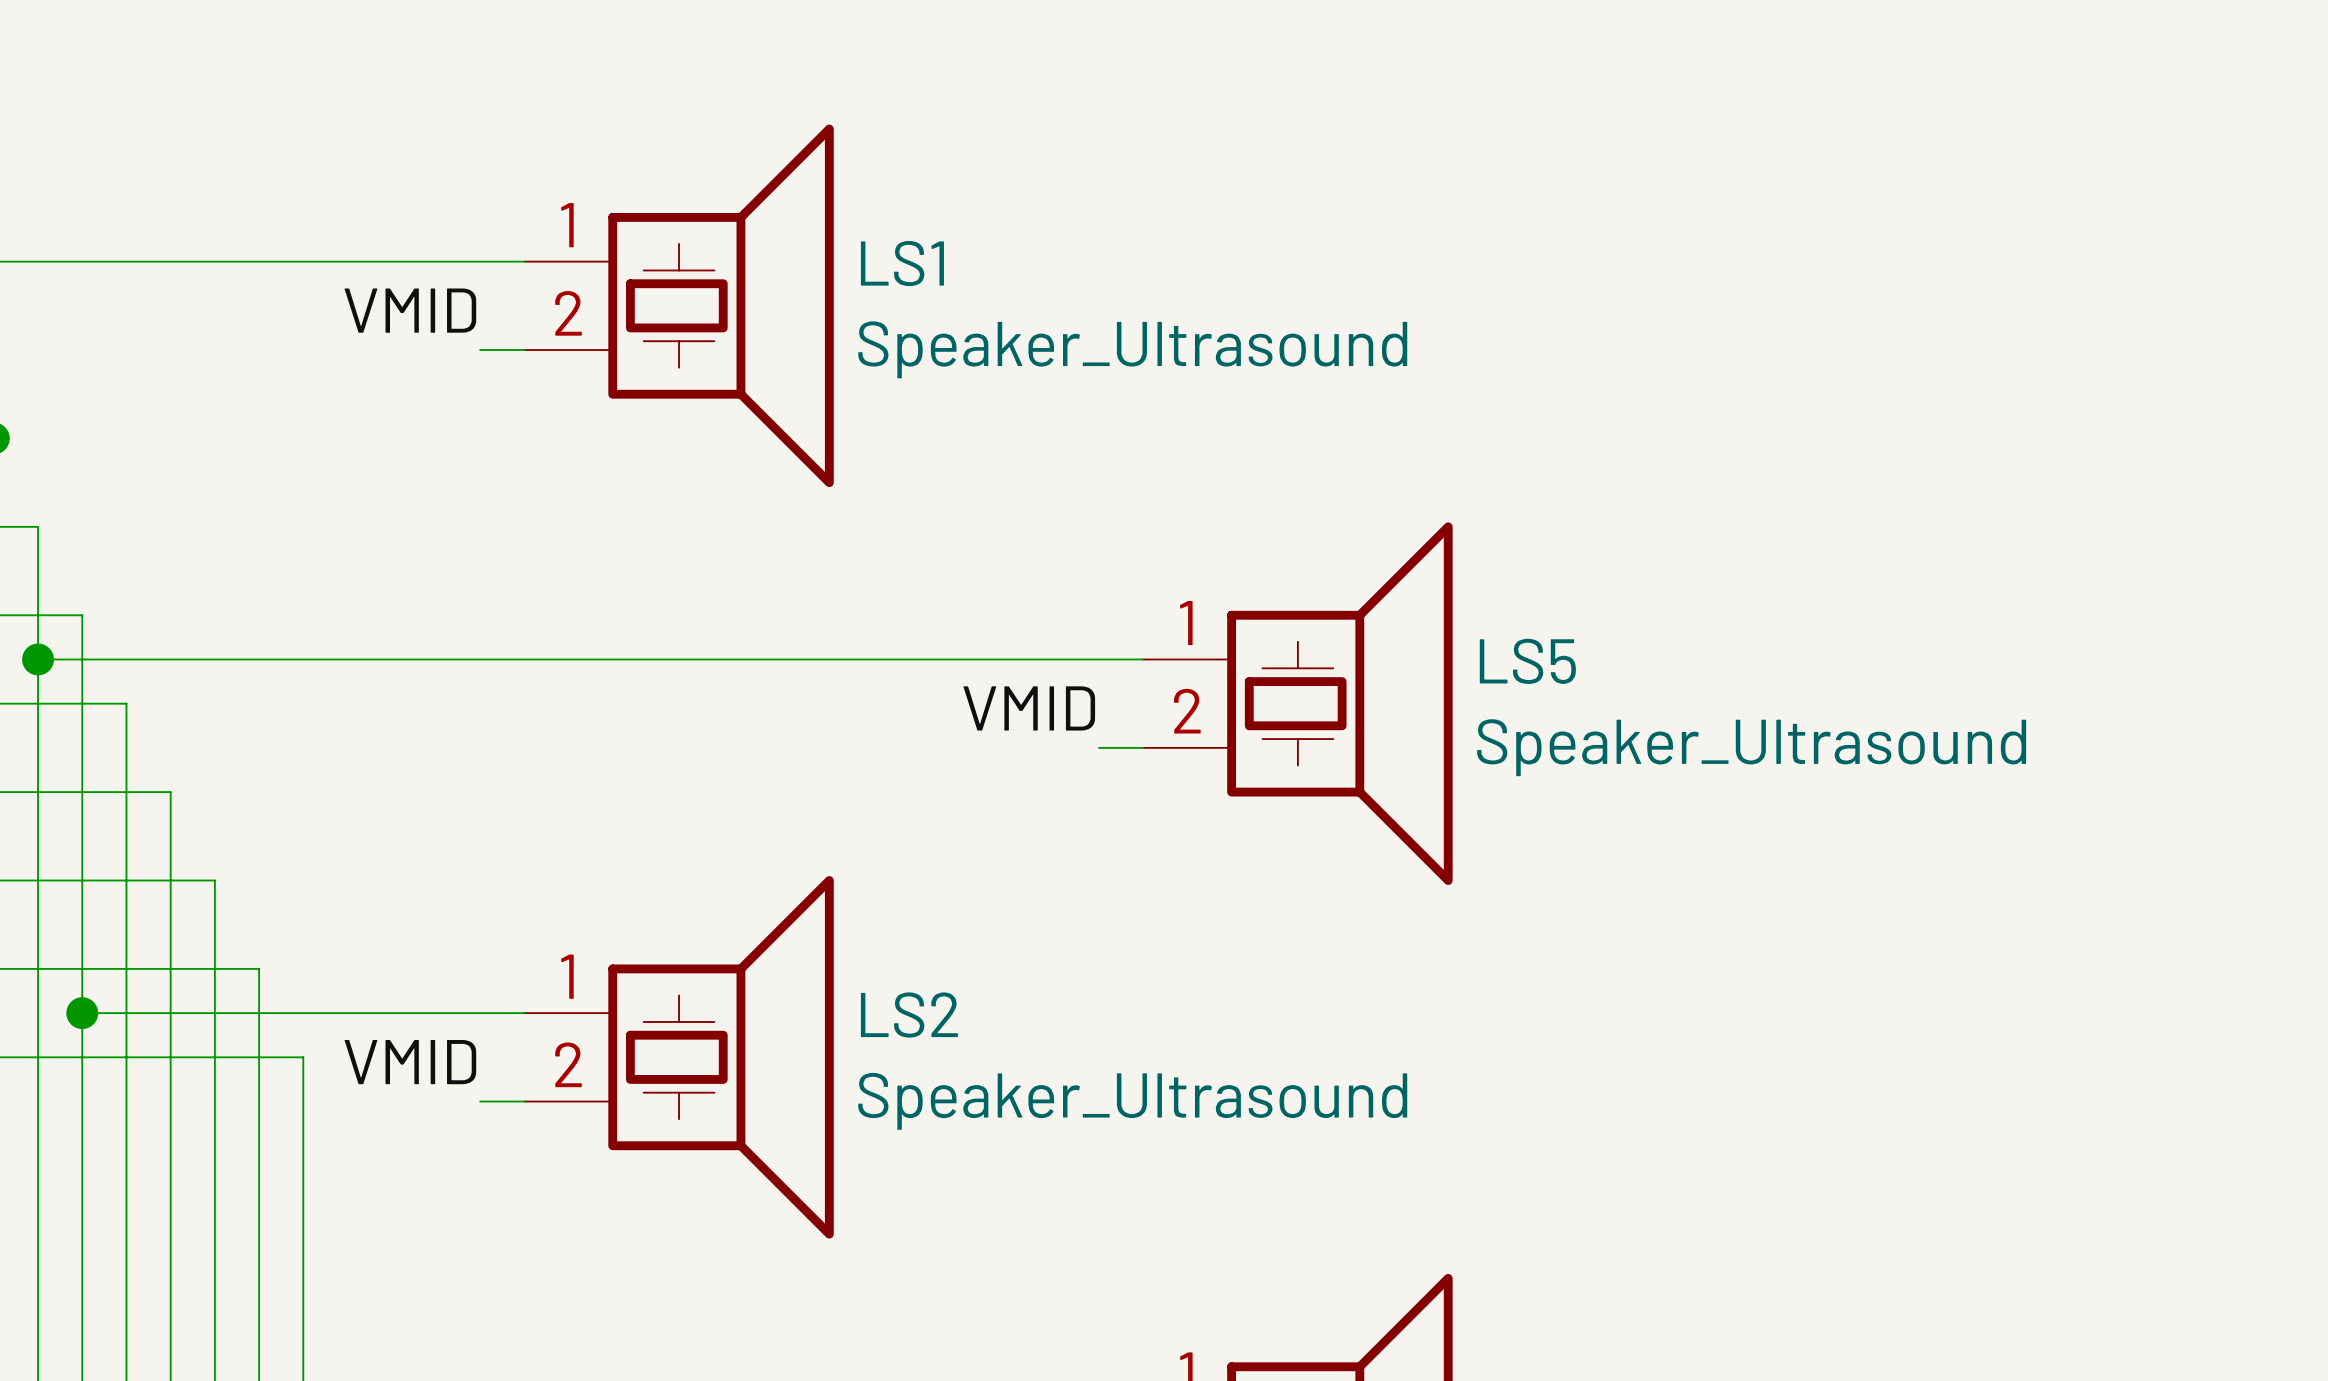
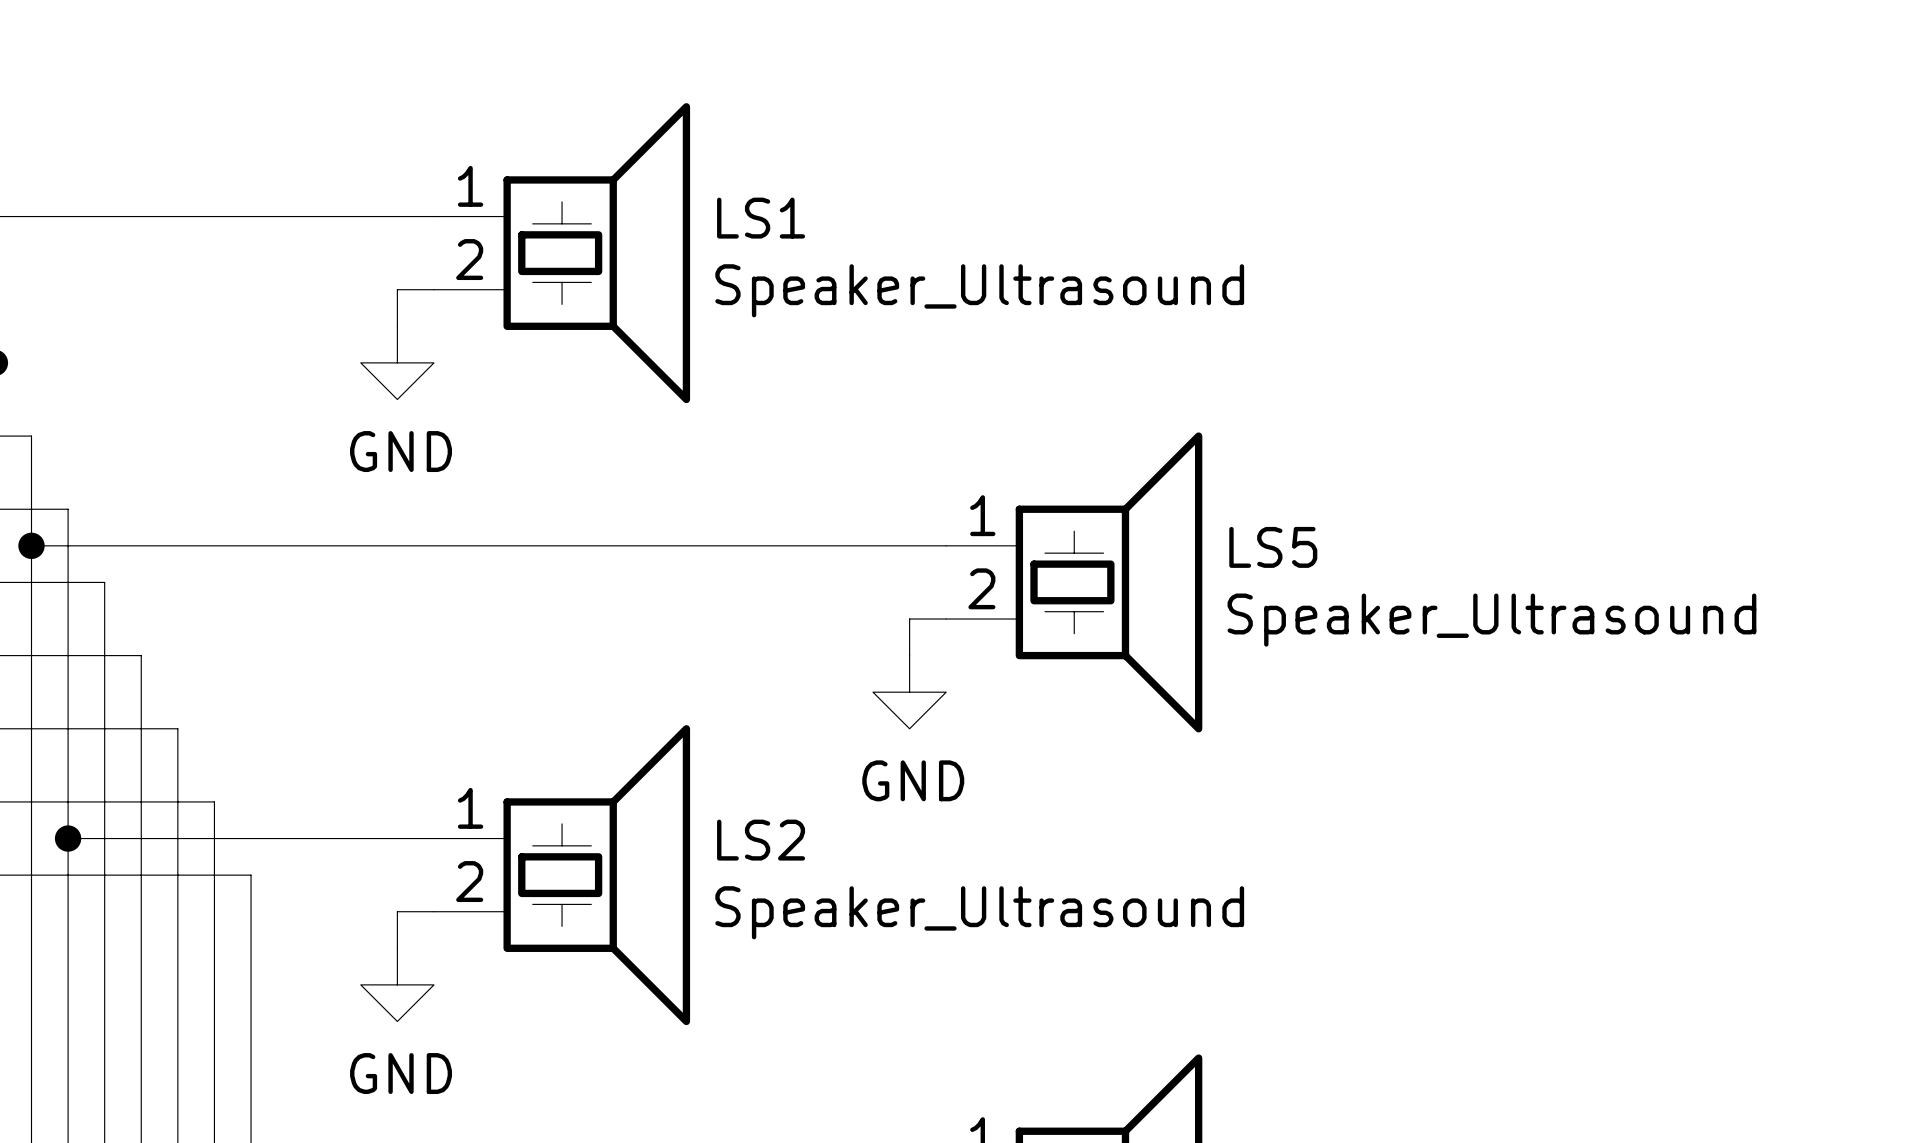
label: VMID (410, 310) -> none
wire: none -> (397, 289) (397, 326)
power symbol: none -> GND (397, 362)
label: VMID (1029, 708) -> none
wire: none -> (909, 619) (909, 655)
power symbol: none -> GND (909, 692)
label: VMID (410, 1062) -> none
wire: none -> (397, 911) (397, 948)
power symbol: none -> GND (397, 984)

